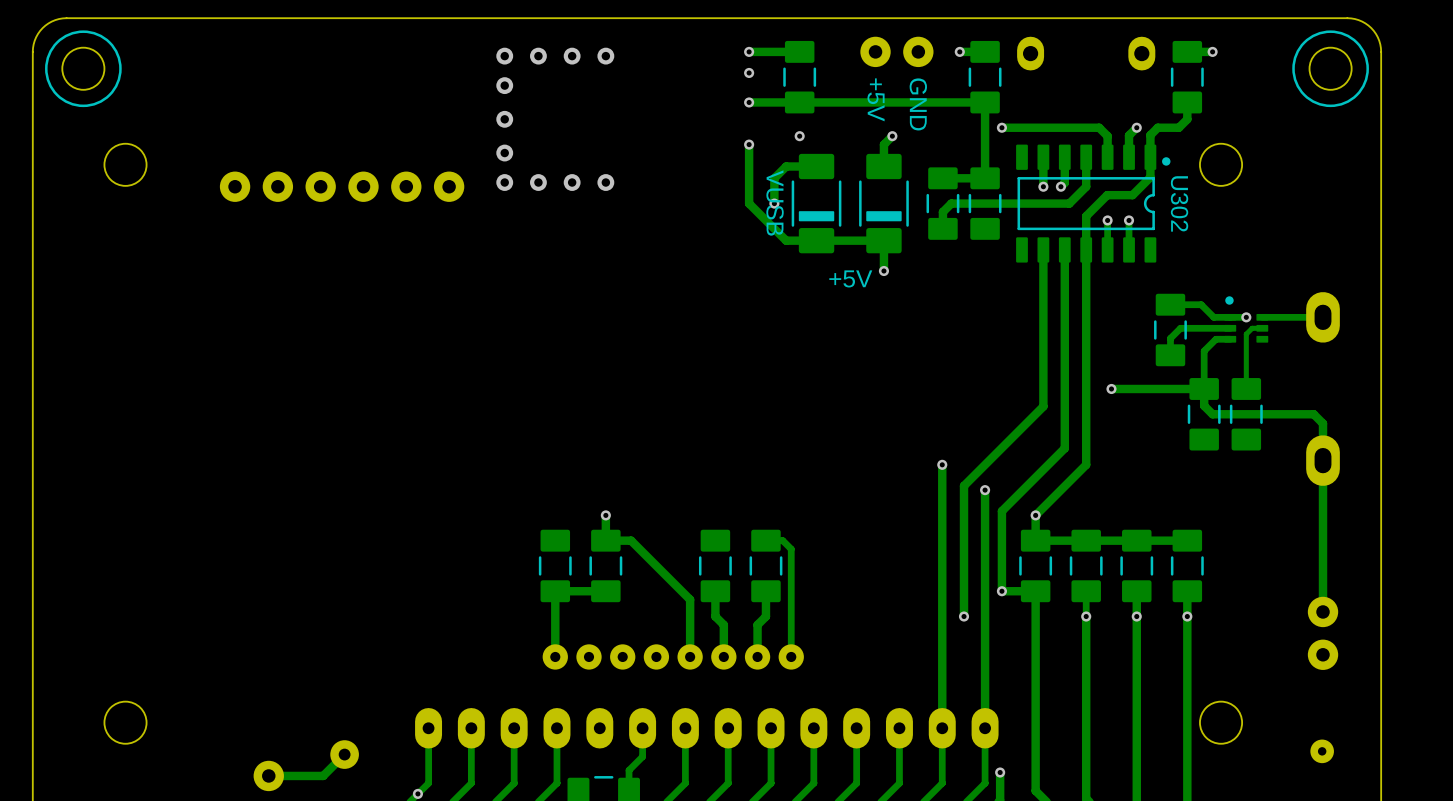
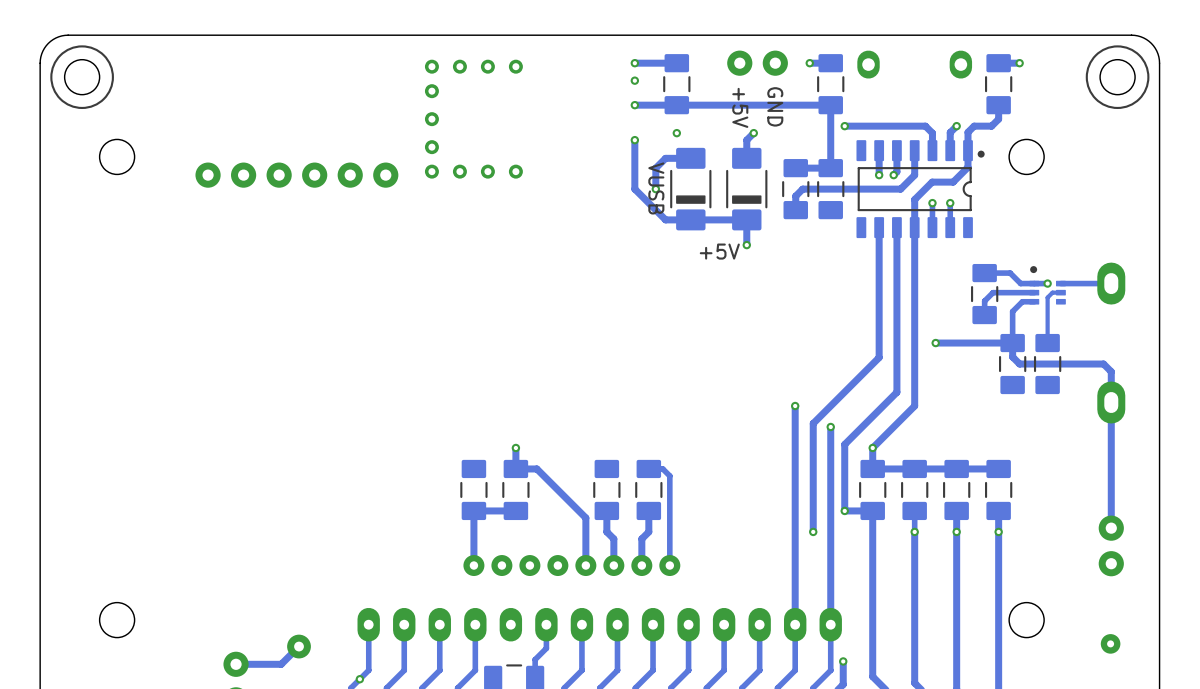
U302 name: U302 (1179, 203) -> none

